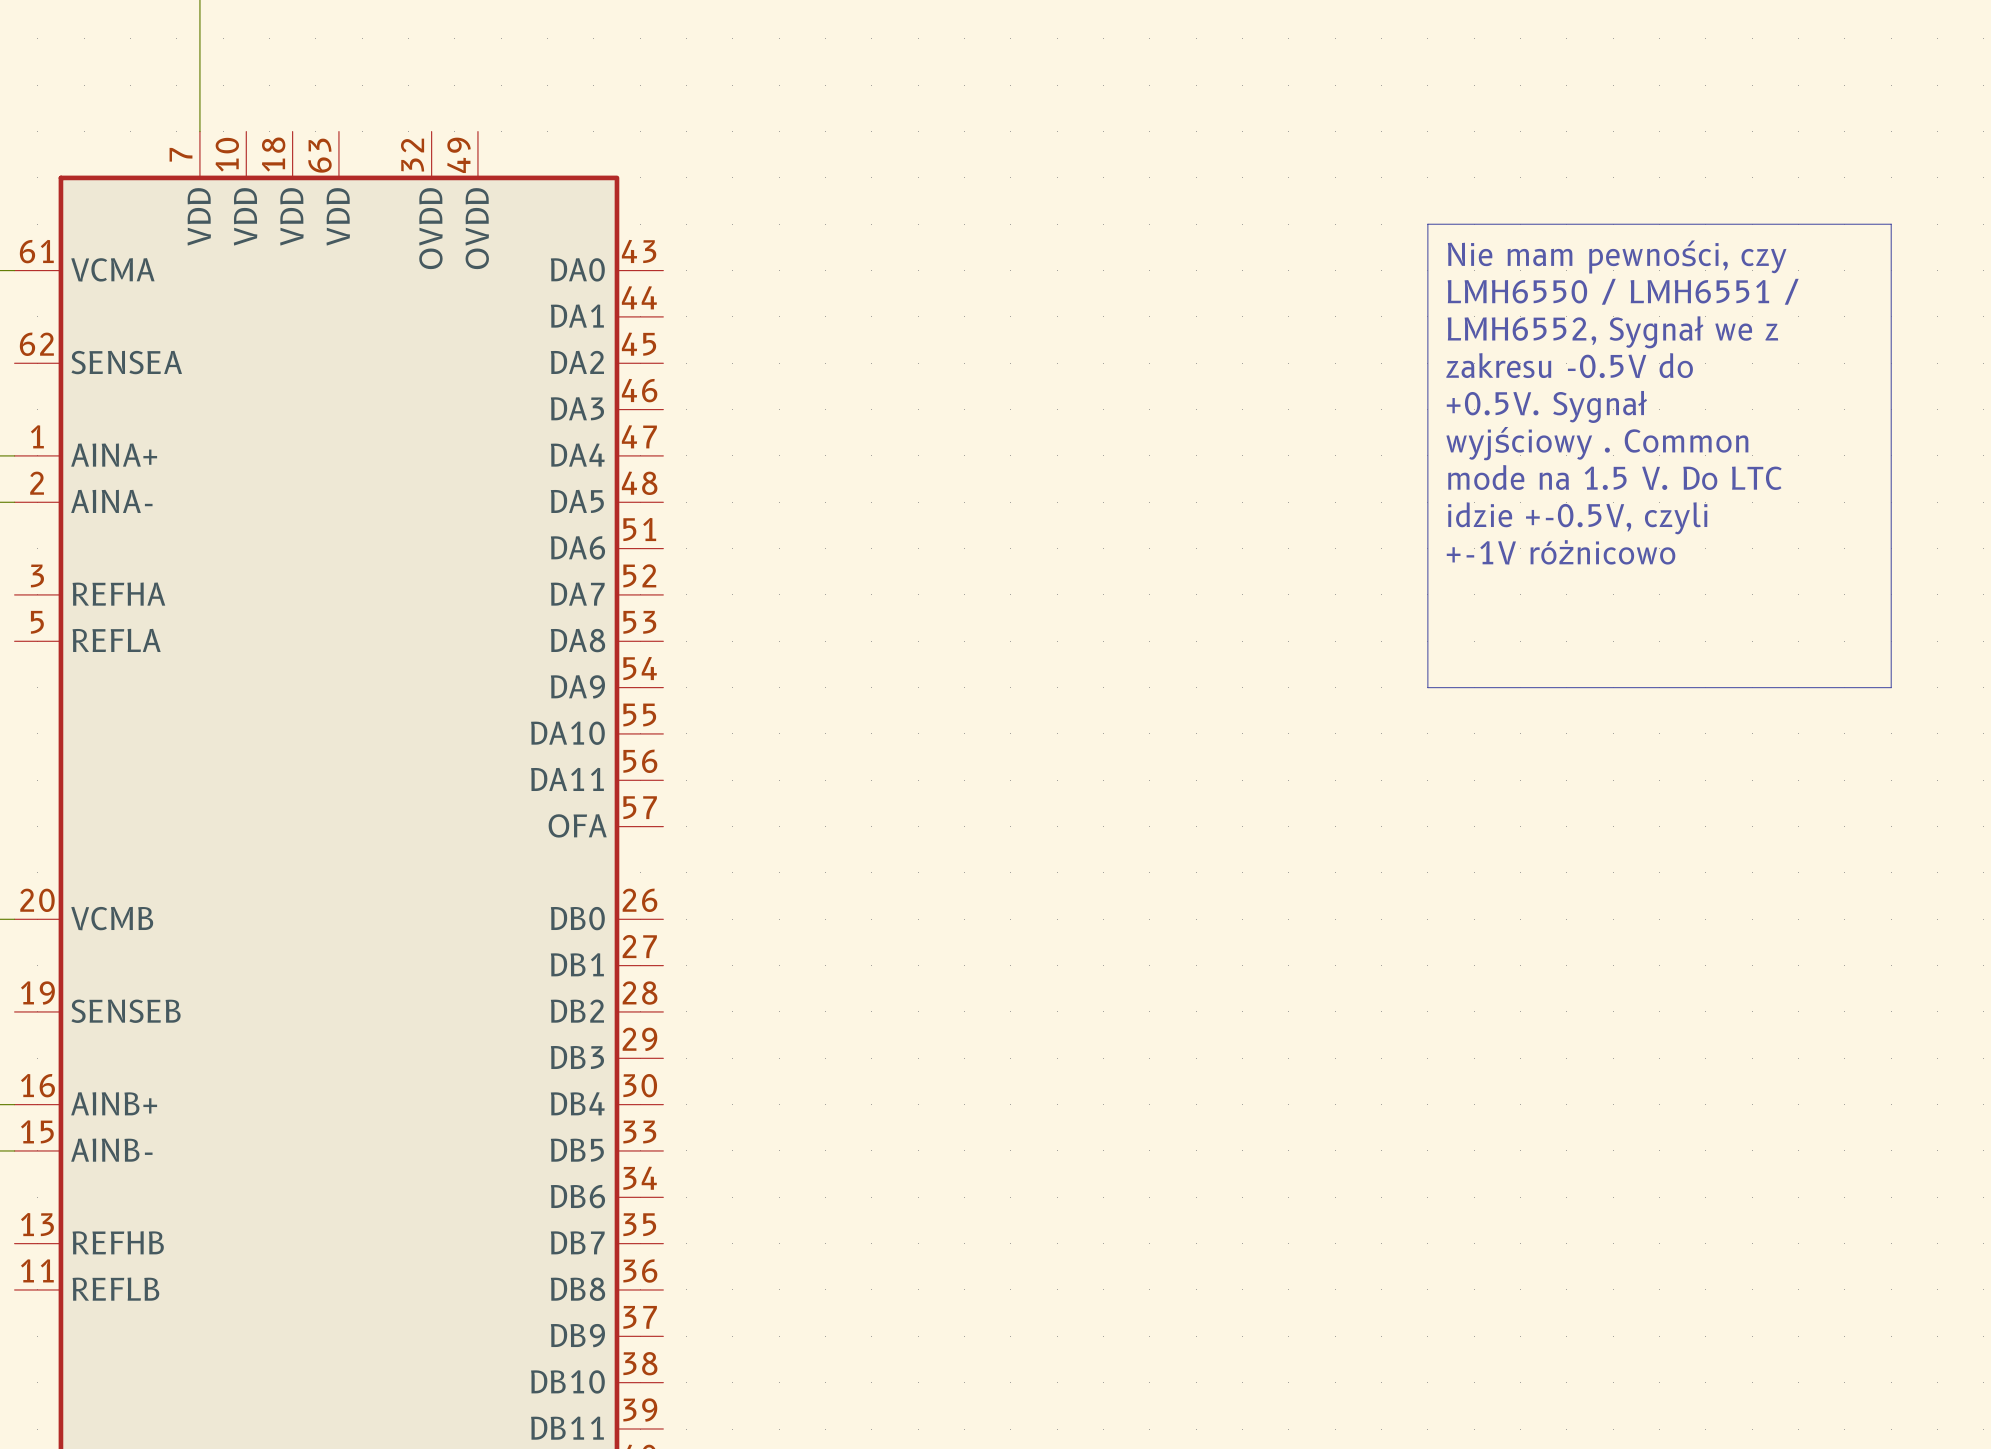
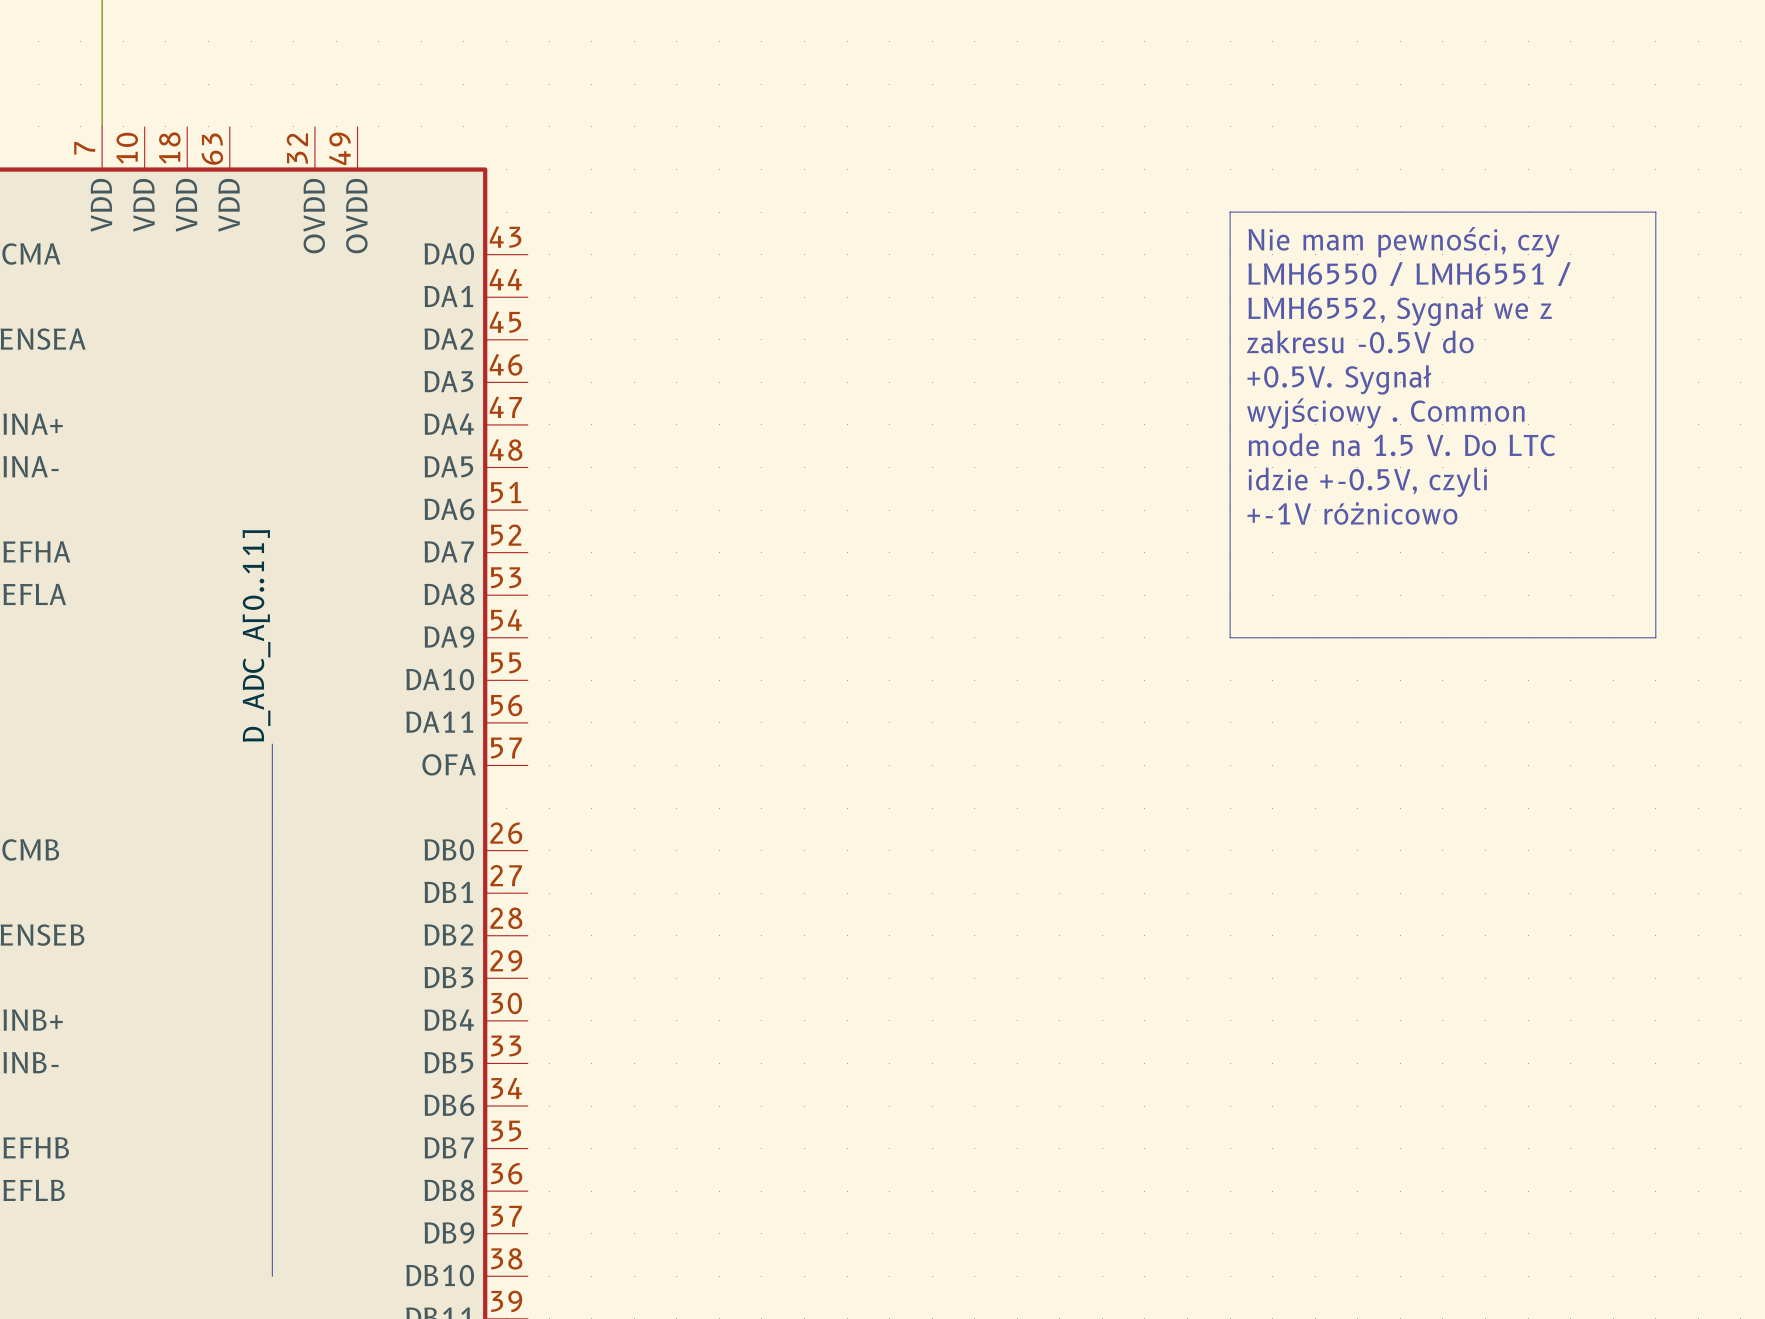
label: none -> D_ADC_A[0..11] (256, 635)
bus: none -> (272, 744) (272, 1276)

